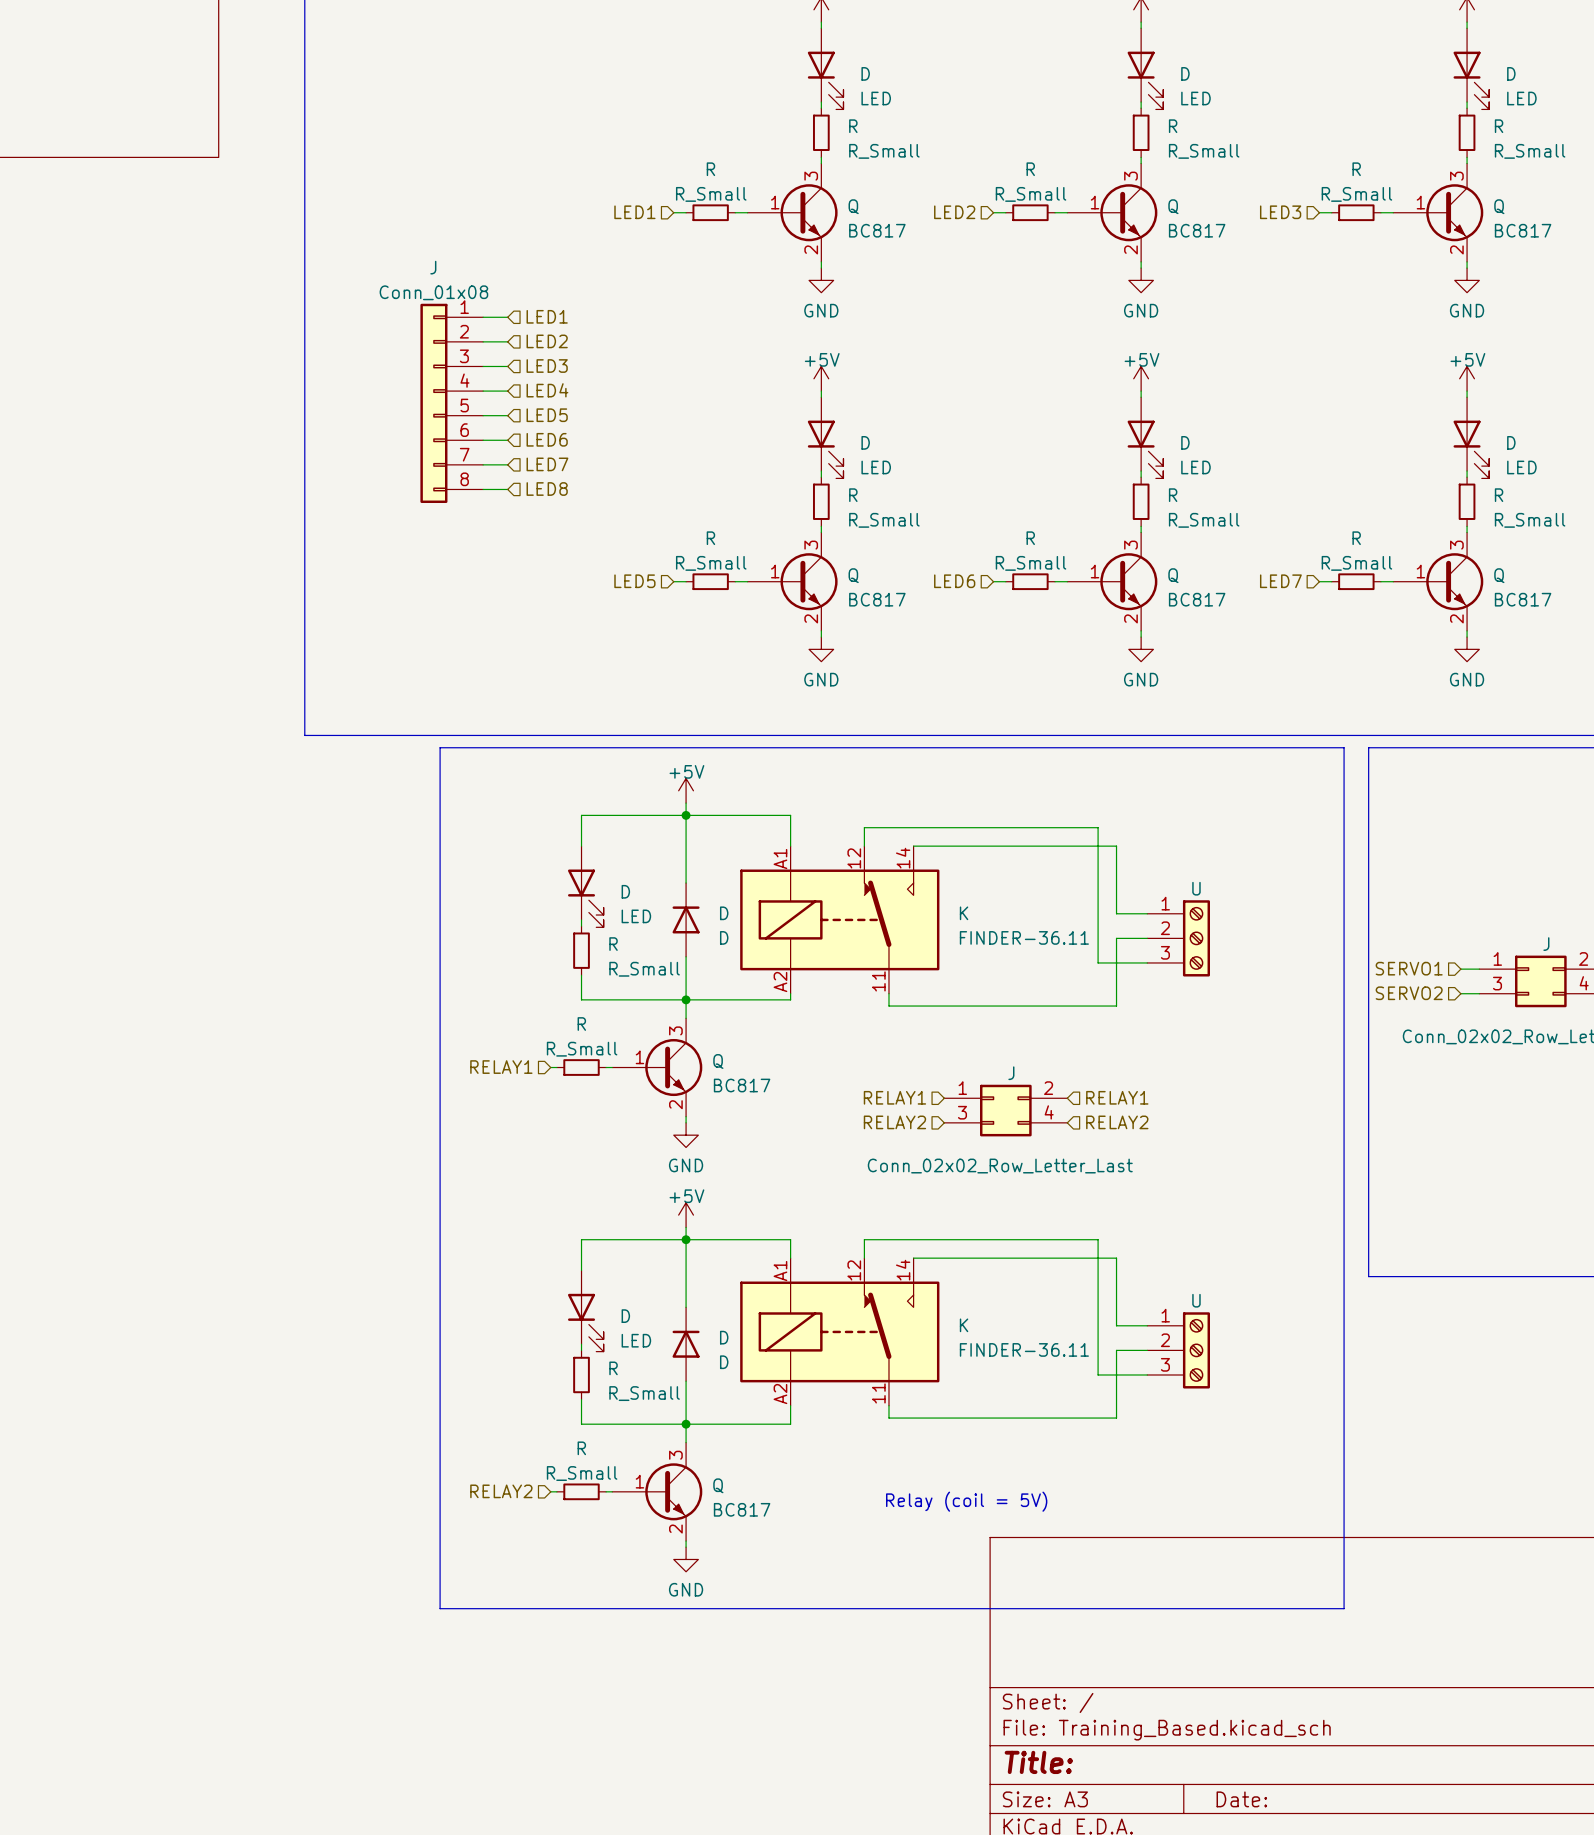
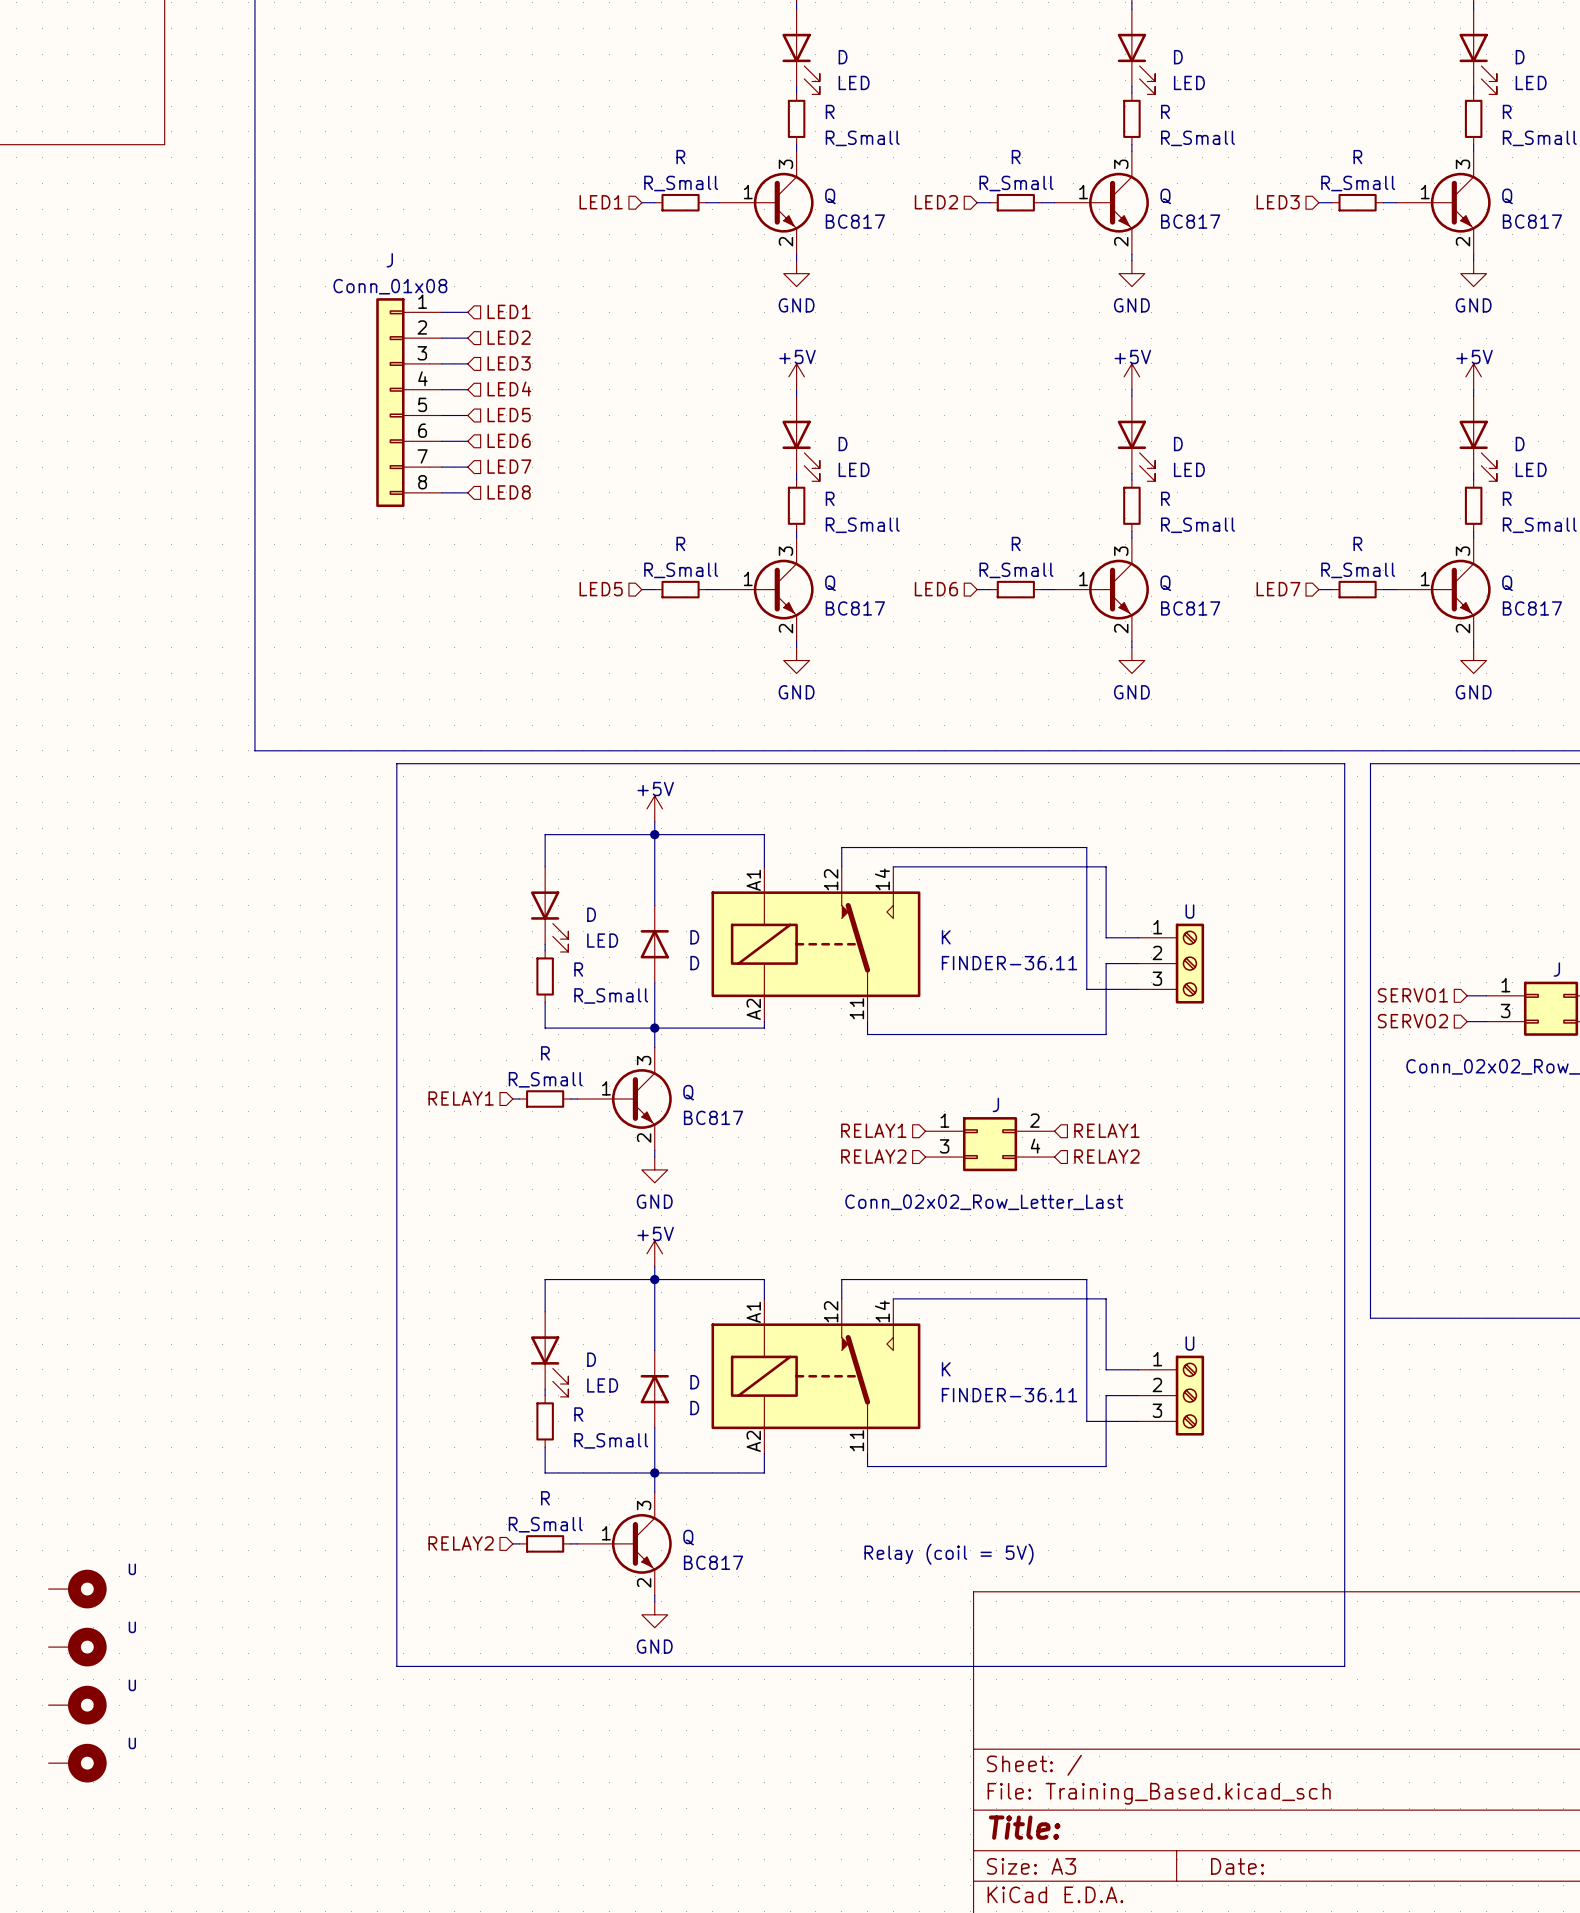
U: none -> (77, 1589)
U: none -> (77, 1647)
U: none -> (77, 1705)
U: none -> (77, 1763)

